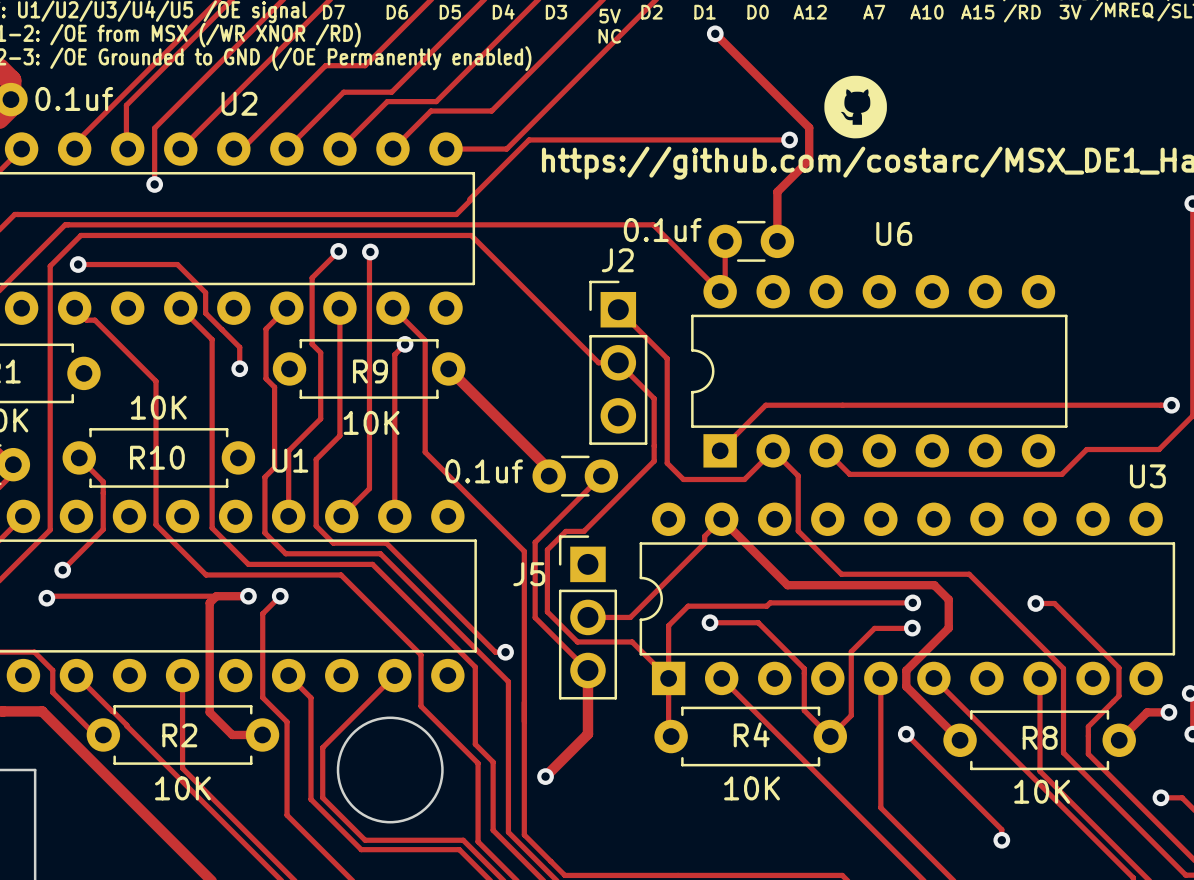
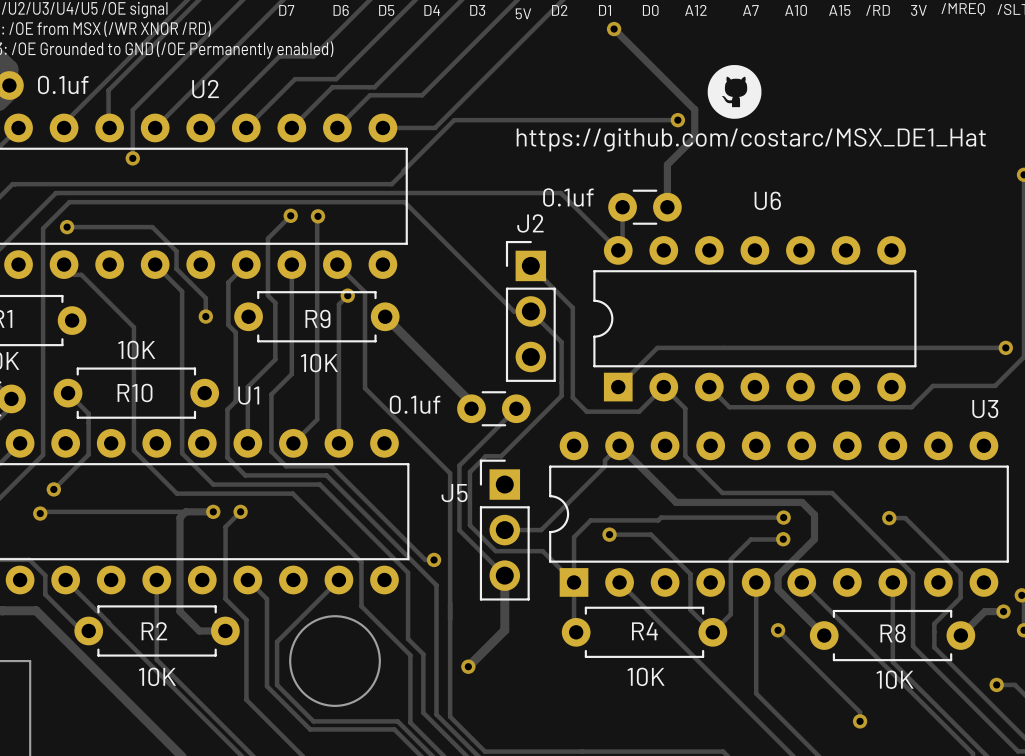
text: NC (609, 36) -> none

